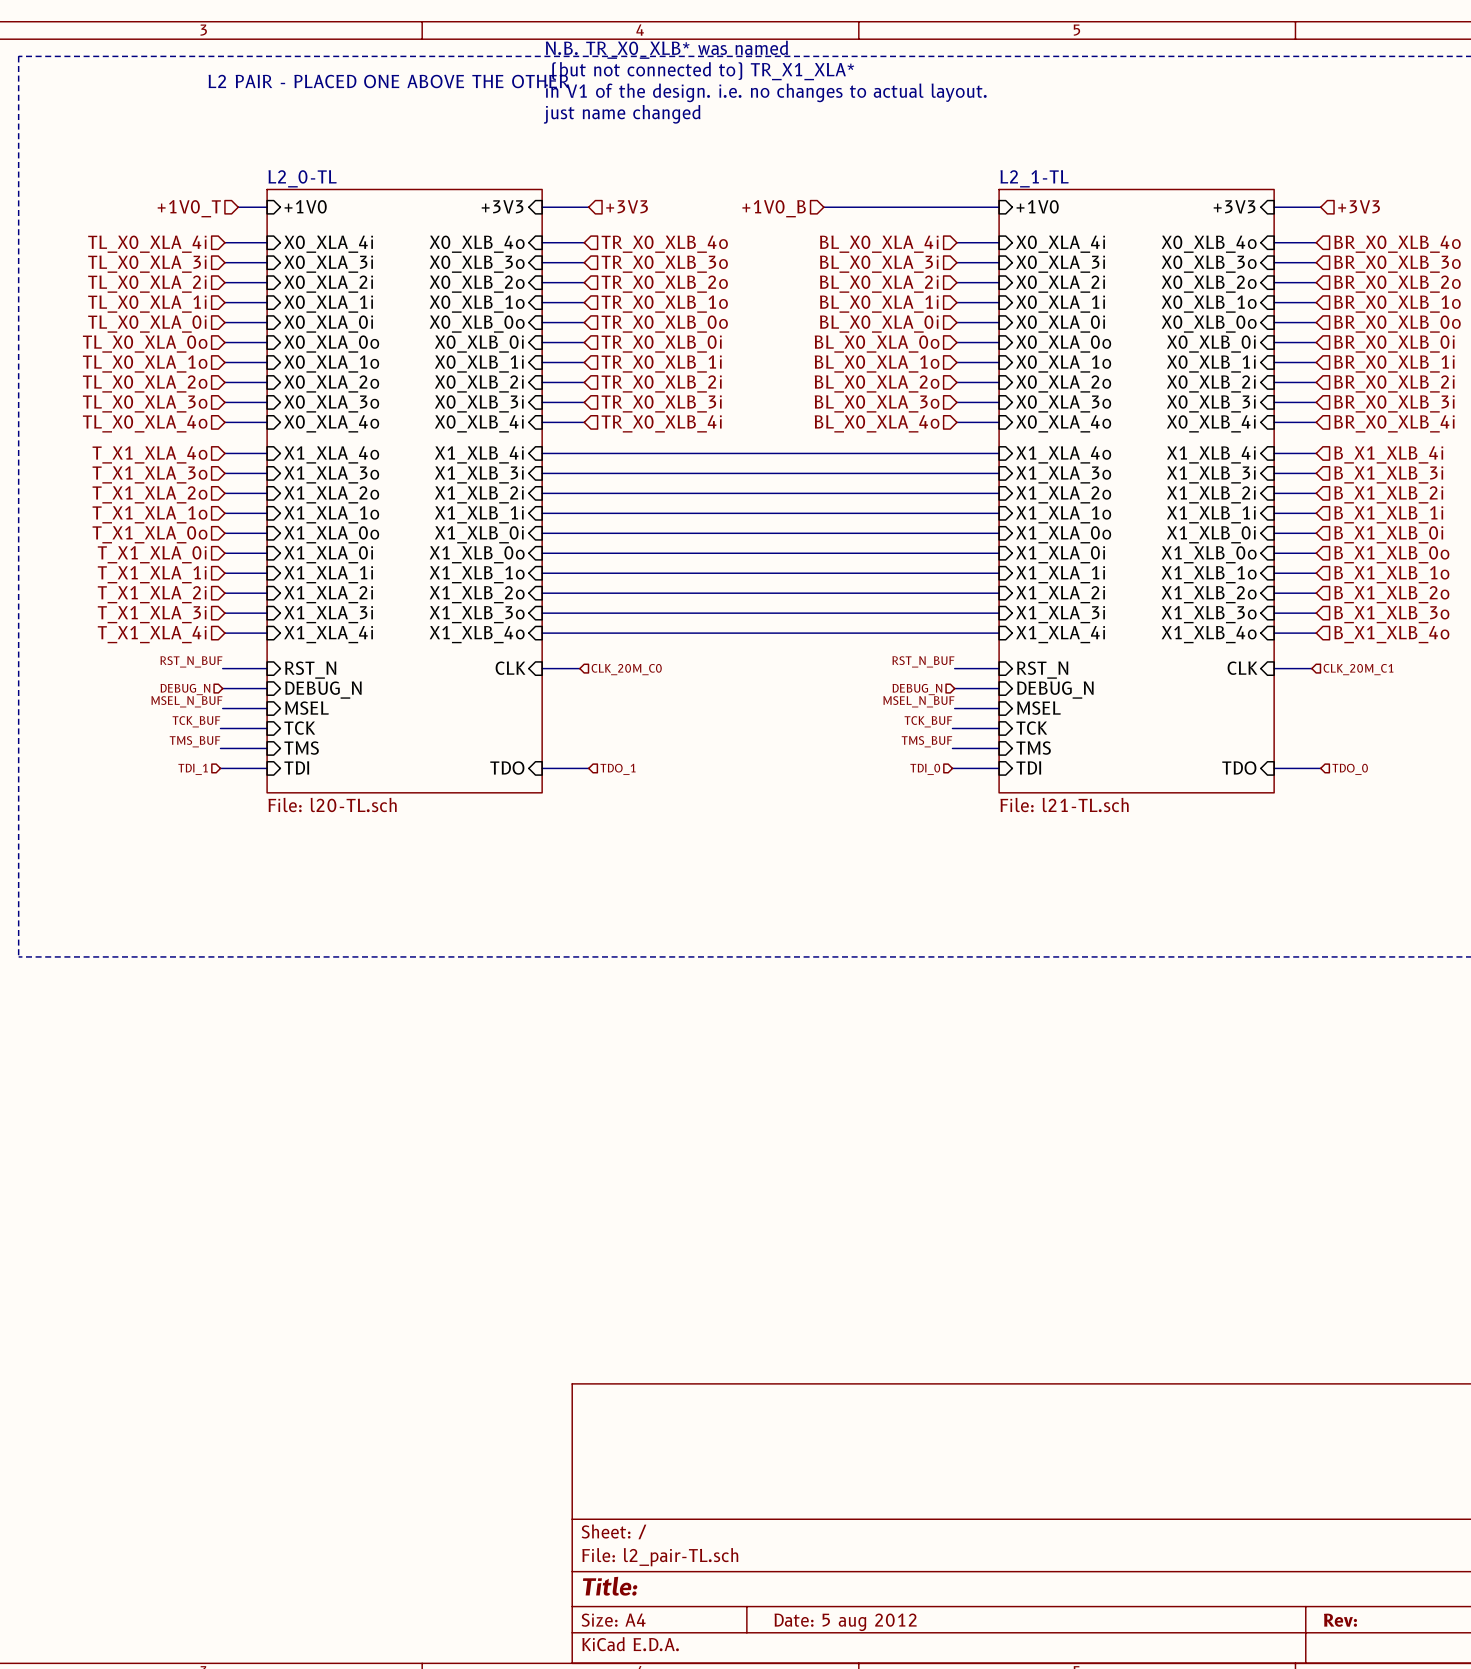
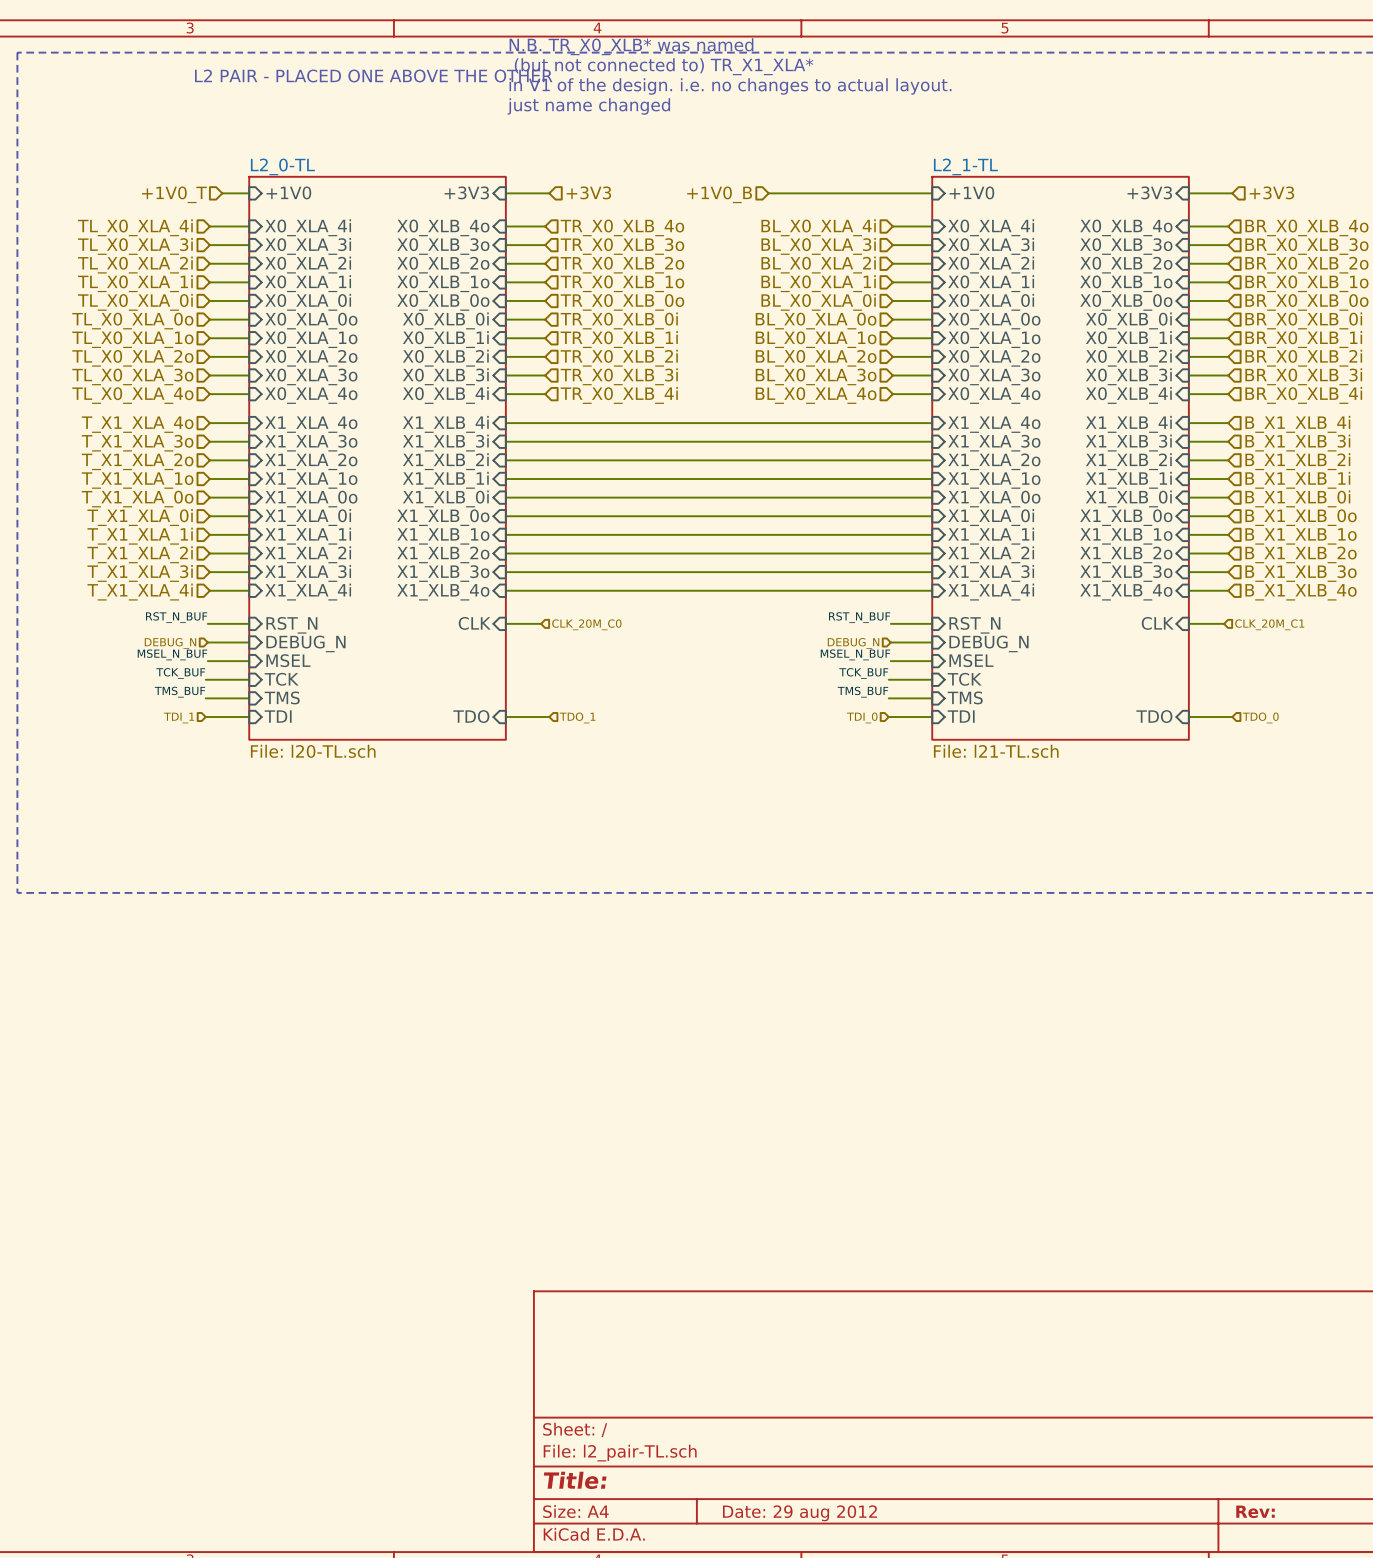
title block: Date: 5 aug 2012 (845, 1622) -> Date: 29 aug 2012 (799, 1513)

